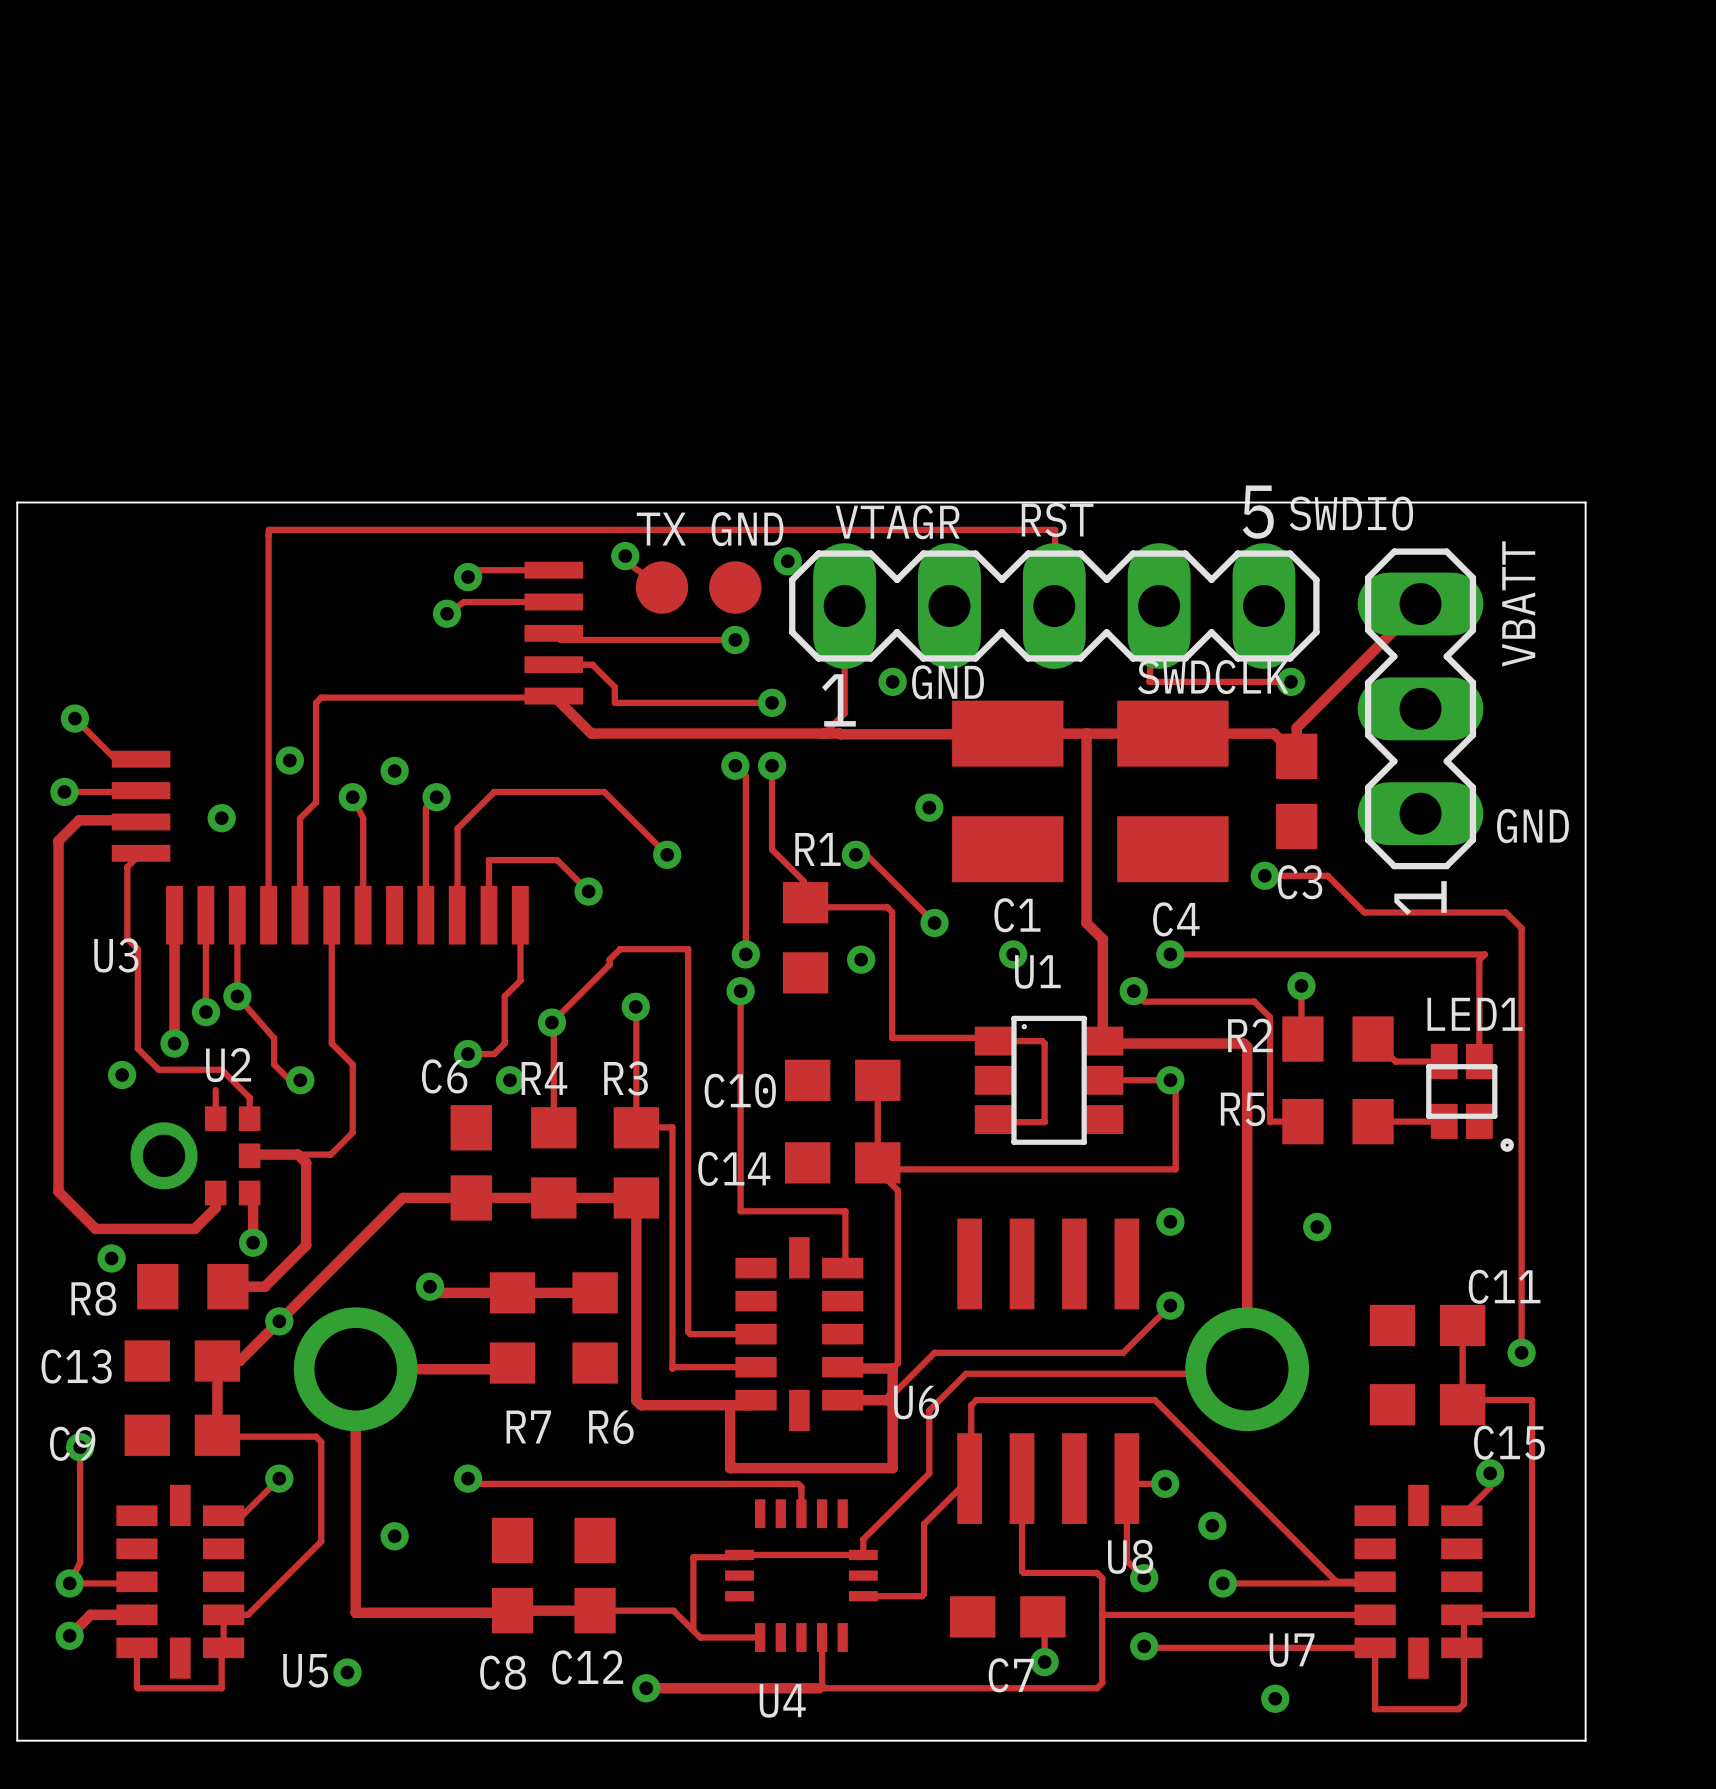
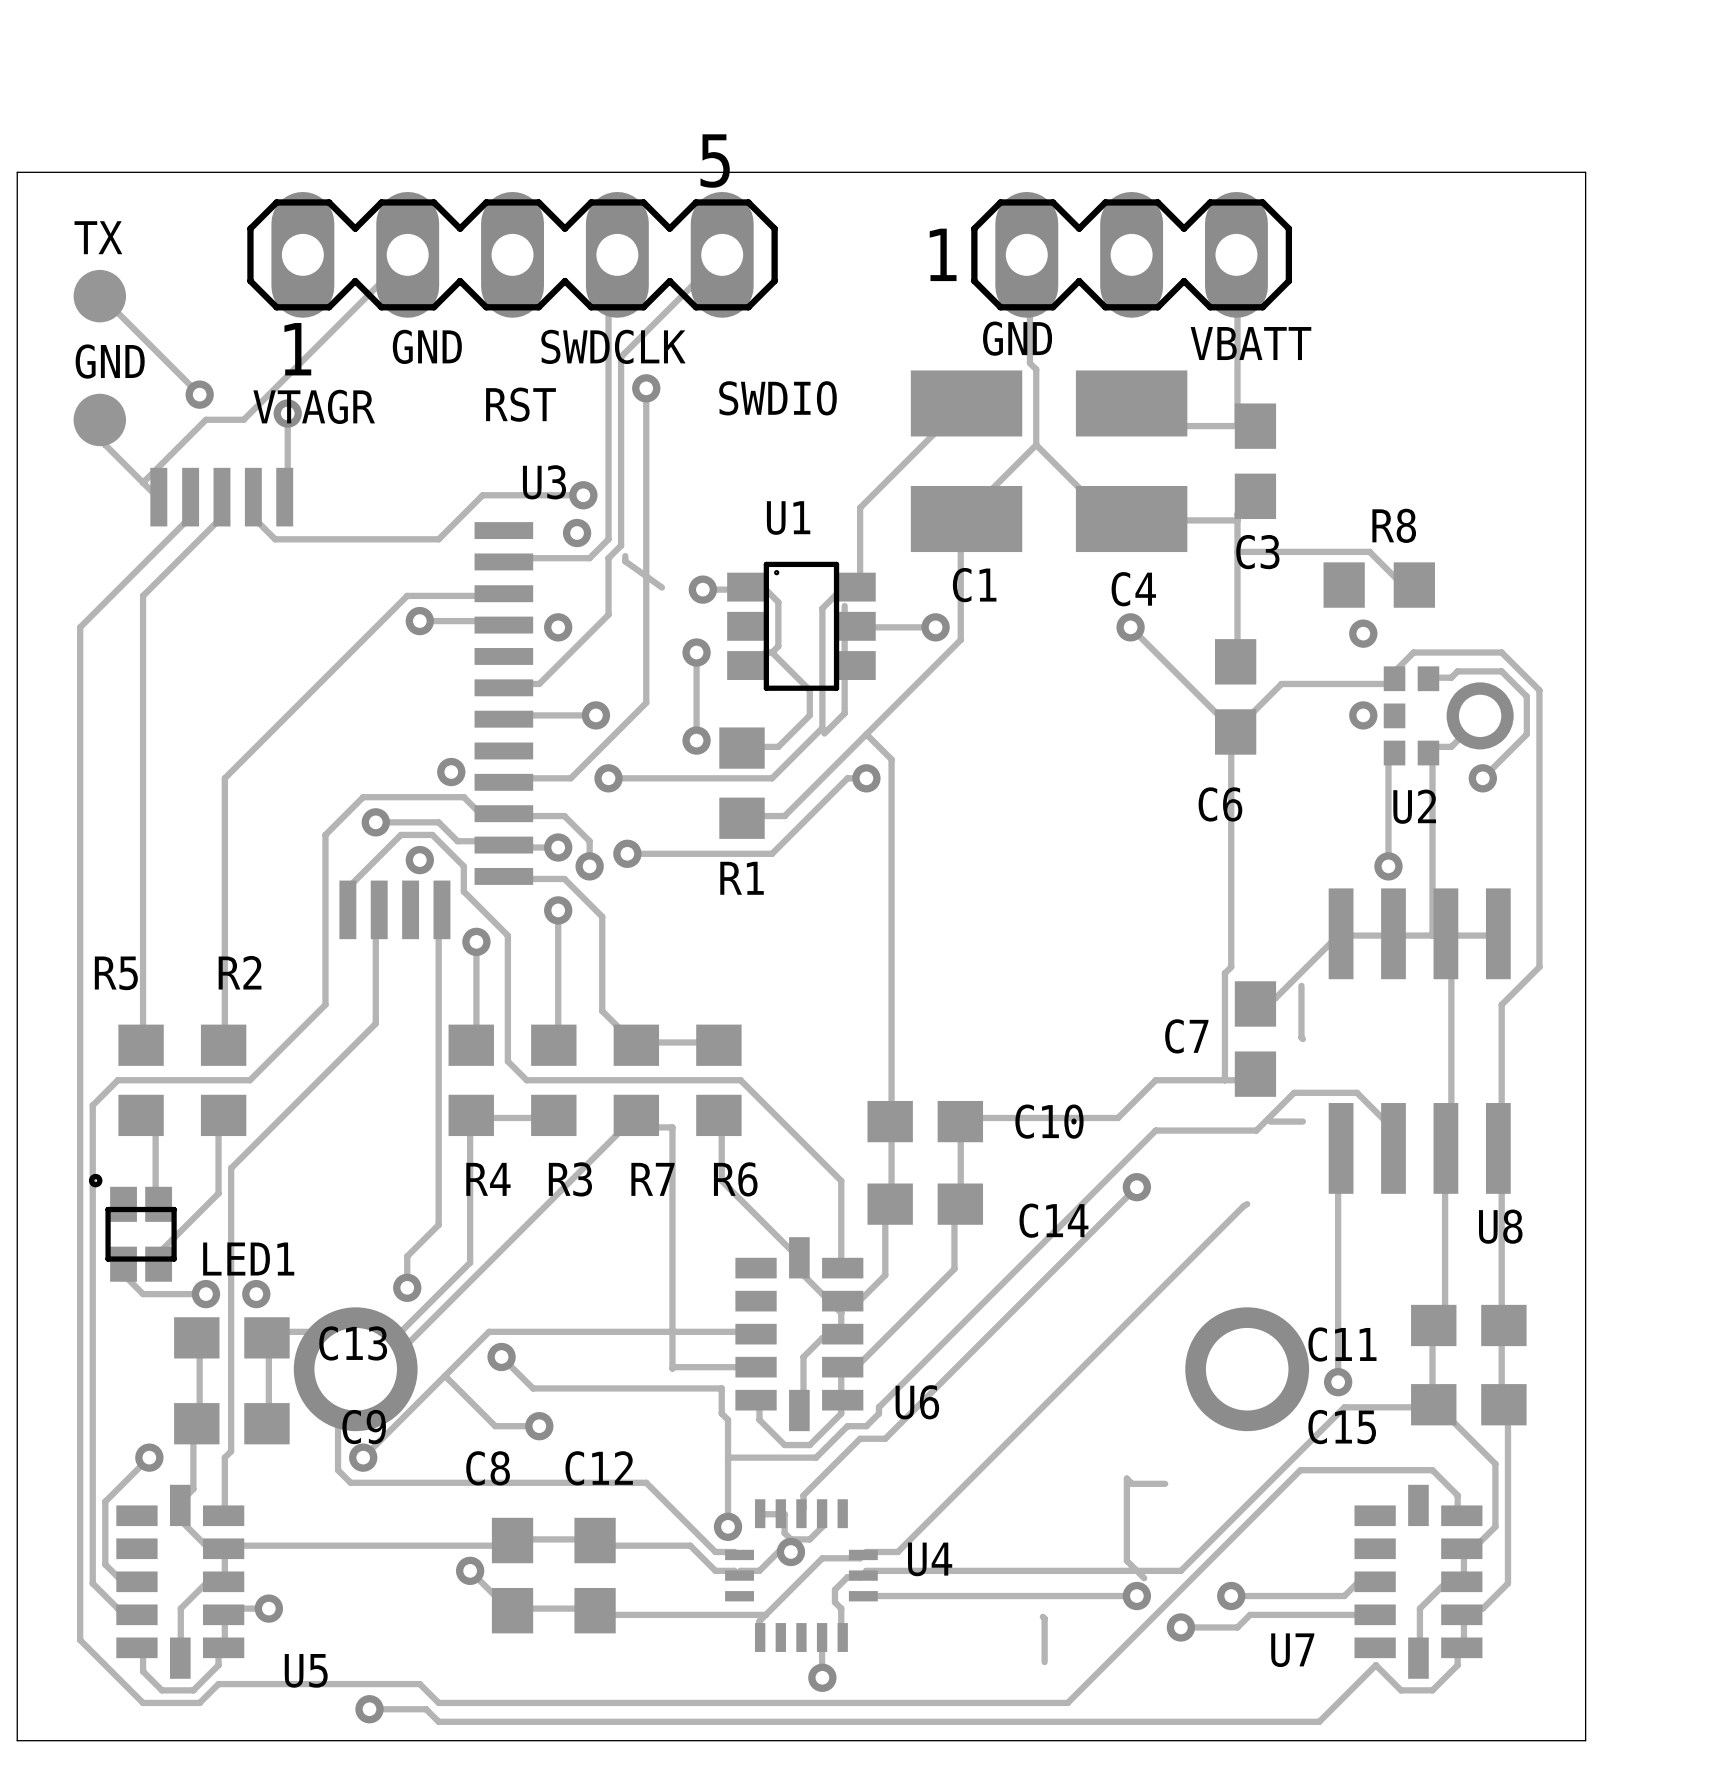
track: none -> (407, 254) (243, 419) (205, 419) (143, 482)
track: none -> (617, 254) (608, 262) (608, 539) (589, 558) (507, 558) (503, 561)
track: none -> (722, 254) (621, 356) (621, 545) (608, 558) (608, 614) (539, 683) (507, 683) (503, 687)
track: none -> (1026, 254) (1029, 256) (1029, 363) (1036, 369) (1036, 444)
track: none -> (1236, 254) (1237, 256) (1237, 426) (1255, 426) (1155, 426) (1131, 403)
track: none -> (99, 296) (199, 394)
text: none -> GND (1017, 338)
text: none -> GND (427, 346)
track: none -> (646, 388) (646, 702) (570, 778) (507, 778) (503, 782)
via: none -> (646, 388)
via: none -> (199, 394)
track: none -> (966, 403) (860, 507) (860, 583) (853, 589) (841, 589) (822, 608) (822, 728) (772, 778) (608, 778)
track: none -> (287, 413) (287, 495) (284, 497)
via: none -> (287, 413)
track: none -> (99, 419) (105, 426) (105, 444) (158, 497)
track: none -> (1036, 444) (967, 514) (966, 519) (960, 520) (960, 639) (784, 816) (746, 816) (742, 818)
track: none -> (1036, 444) (1105, 514) (1130, 514) (1131, 519) (1136, 520) (1237, 520)
track: none -> (583, 495) (482, 495) (438, 539) (275, 539) (256, 520) (256, 501) (253, 497)
via: none -> (583, 495)
track: none -> (1255, 496) (1237, 514) (1237, 658) (1235, 661)
track: none -> (190, 497) (187, 501) (187, 520) (80, 627) (80, 1447)
track: none -> (221, 497) (218, 501) (218, 520) (143, 595) (143, 1042) (141, 1045)
board edge: (17, 502) (1585, 502) -> (17, 502) (17, 172) (1585, 172) (1585, 502)
text position: SWDIO (1351, 513) -> SWDIO (777, 398)
text position: RST (1057, 519) -> RST (520, 404)
text position: VTAGR (897, 522) -> VTAGR (314, 406)
via: none -> (577, 533)
track: none -> (1237, 551) (1369, 551) (1401, 583) (1413, 583) (1414, 585)
via: (625, 556) -> none
via: (787, 561) -> none
track: (553, 570) (474, 570) (468, 577) -> none
via: (468, 577) -> none
TX position: (661, 587) -> (99, 296)
GND position: (735, 587) -> (99, 419)
track: none -> (702, 589) (746, 589) (747, 587) (753, 589) (765, 589) (778, 602) (778, 646) (772, 652)
via: none -> (702, 589)
track: none -> (503, 593) (501, 595) (407, 595) (224, 778) (223, 1045)
track: (553, 601) (464, 601) (447, 613) -> none
text rotation: 0° (1518, 603) -> 90° clockwise (1250, 343)
text position: VBATT (1518, 603) -> VBATT (1250, 343)
track: (1420, 604) (1296, 727) (1296, 756) (1274, 733) (591, 733) (553, 696) (552, 697) (321, 697) (316, 702) (316, 802) (299, 818) (299, 915) -> none
track: (1054, 606) (1055, 529) (268, 529) (268, 915) -> none
part position: (1054, 606) -> (512, 254)
track: (1159, 606) (1154, 585) (1149, 681) (1290, 681) -> none
via position: (447, 613) -> (419, 621)
track: none -> (419, 621) (501, 621) (503, 625)
track: none -> (855, 626) (935, 627)
via: none -> (558, 627)
via: none -> (935, 627)
track: none -> (1130, 627) (1235, 731)
via: none -> (1130, 627)
track: (553, 633) (560, 639) (735, 639) -> none
via: none -> (1363, 633)
via: (735, 639) -> none
track: none -> (696, 652) (696, 740)
via: none -> (696, 652)
track: none -> (772, 652) (809, 690) (809, 715) (778, 746) (742, 748)
track: (553, 664) (592, 664) (614, 687) (614, 702) (772, 702) -> none
text position: SWDCLK (1213, 677) -> SWDCLK (613, 346)
track: none -> (1428, 678) (1451, 677) (1457, 671) (1501, 671) (1526, 696) (1526, 734) (1482, 778)
via: (892, 681) -> none
via: (1290, 681) -> none
text: GND (948, 682) -> none
via: (772, 702) -> none
part rotation: 0° (1420, 708) -> 90° clockwise (1131, 254)
part position: (1420, 708) -> (1131, 254)
track: none -> (595, 715) (507, 715) (503, 719)
via: none -> (595, 715)
via: none -> (1363, 715)
track: none -> (1480, 715) (1451, 746) (1432, 746) (1428, 753) (1432, 753) (1432, 935)
track: (74, 718) (115, 759) (141, 759) -> none
via: (74, 718) -> none
track: none -> (1235, 731) (1281, 683) (1388, 683) (1394, 678) (1388, 677) (1413, 652) (1501, 652) (1539, 690) (1539, 967) (1501, 1004) (1501, 1143) (1498, 1148) (1501, 1149) (1501, 1319) (1503, 1325) (1501, 1325) (1501, 1401) (1507, 1407) (1507, 1583) (1482, 1608) (1463, 1608) (1461, 1614) (1463, 1614)
track: none -> (1235, 731) (1231, 734) (1231, 967) (1224, 973) (1224, 1080)
track: (1086, 733) (1086, 922) (1102, 939) (1102, 1041) (1105, 1043) (1243, 1043) (1247, 1046) (1247, 1369) (1242, 1373) (966, 1373) (929, 1410) (929, 1473) (863, 1539) (863, 1554) (739, 1554) (737, 1557) (693, 1557) (693, 1630) -> none
track: none -> (866, 734) (891, 759) (891, 1199) (890, 1204) (885, 1206) (885, 1275) (860, 1300) (842, 1301) (841, 1338) (822, 1338) (803, 1357) (803, 1407) (799, 1410)
via: none -> (696, 740)
U3 rotation: 0° (347, 753) -> 90° counterclockwise (341, 703)
track: none -> (1394, 753) (1388, 753) (1388, 866)
via: (289, 760) -> none
track: (735, 765) (745, 776) (745, 954) -> none
via: (735, 765) -> none
track: (772, 765) (772, 849) (803, 881) (803, 911) (805, 902) -> none
via: (772, 765) -> none
via: (394, 770) -> none
via: none -> (608, 778)
track: none -> (866, 778) (847, 778) (772, 853) (627, 853)
via: none -> (866, 778)
via: none -> (1482, 778)
track: (141, 790) (64, 791) -> none
via: (64, 791) -> none
C1 position: (1007, 791) -> (966, 461)
C4 position: (1172, 791) -> (1131, 461)
C3 position: (1296, 791) -> (1255, 461)
track: (352, 797) (363, 818) (363, 915) -> none
via position: (352, 797) -> (375, 822)
track: (436, 797) (425, 807) (425, 915) -> none
via position: (436, 797) -> (451, 772)
via: (929, 807) -> none
via: (221, 818) -> none
track: (141, 821) (139, 820) (79, 820) (58, 840) (58, 1191) (95, 1228) (194, 1228) (215, 1207) (215, 1193) -> none
track: none -> (375, 822) (438, 822) (457, 841) (501, 841) (507, 847) (558, 847)
text: GND (1532, 826) -> none
via: none -> (558, 847)
R1 name position: R1 (817, 849) -> R1 (742, 878)
track: (141, 853) (127, 867) (127, 938) (137, 949) (137, 1048) (158, 1069) (221, 1069) (249, 1097) (249, 1118) -> none
via: none -> (627, 853)
track: (667, 854) (604, 791) (494, 791) (457, 828) (457, 915) -> none
via: (667, 854) -> none
track: (855, 854) (866, 854) (934, 922) -> none
via: (855, 854) -> none
via: none -> (419, 860)
via: none -> (1388, 866)
track: (1264, 875) (1327, 875) (1364, 912) (1505, 912) (1521, 928) (1521, 1352) -> none
via: (1264, 875) -> none
track: none -> (503, 876) (507, 878) (564, 878) (602, 916) (602, 1011) (636, 1045) (639, 1042) (715, 1042) (718, 1045)
track: (588, 891) (557, 860) (489, 860) (489, 915) -> none
via position: (588, 891) -> (589, 866)
track: (805, 902) (810, 907) (887, 907) (892, 912) (892, 1037) (992, 1037) (995, 1041) (1042, 1041) (1044, 1043) (1044, 1122) (998, 1122) (995, 1119) -> none
track: none -> (441, 909) (438, 910) (438, 1224) (407, 1256) (407, 1287)
track: none -> (558, 910) (558, 1042) (553, 1045)
via: none -> (558, 910)
track: (174, 915) (174, 1043) -> none
track: (205, 915) (205, 1012) -> none
track: (237, 915) (237, 996) (274, 1038) (274, 1064) (289, 1080) (300, 1080) -> none
track: (331, 915) (331, 1043) (352, 1064) (352, 1132) (330, 1154) (297, 1154) -> none
track: (520, 915) (520, 980) (504, 996) (504, 1043) (494, 1054) (468, 1054) -> none
via: (934, 922) -> none
track: none -> (1498, 933) (1495, 935) (1451, 935)
track: none -> (1451, 935) (1451, 1143) (1445, 1149) (1445, 1312) (1432, 1325) (1433, 1404)
track: none -> (1451, 935) (1445, 933) (1445, 935) (1394, 935) (1393, 933) (1388, 935) (1344, 935) (1341, 933) (1275, 998) (1256, 998) (1255, 1003)
R1 position: (805, 937) -> (742, 783)
track: none -> (476, 941) (476, 1042) (471, 1045)
via: none -> (476, 941)
via: (745, 954) -> none
via: (1013, 954) -> none
track: (1170, 954) (1484, 954) (1479, 960) (1479, 1061) -> none
via: (1170, 954) -> none
U3 name position: U3 (116, 955) -> U3 (544, 482)
via: (861, 959) -> none
via: (1301, 985) -> none
track: (740, 991) (740, 1211) (845, 1211) (845, 1265) (842, 1268) -> (347, 909) (350, 904) (350, 885) (400, 834) (432, 834) (463, 866) (463, 891) (507, 935) (507, 1061) (526, 1080) (740, 1080) (841, 1180) (842, 1268)
via: (740, 991) -> none
track: (1133, 991) (1144, 1001) (1254, 1001) (1270, 1017) (1270, 1122) -> none
via: (1133, 991) -> none
via: (237, 996) -> none
via: (635, 1006) -> none
track: (636, 1007) (636, 1127) -> none
via: (205, 1012) -> none
LED1 name position: LED1 (1475, 1014) -> LED1 (248, 1259)
via: (551, 1022) -> none
R2 rotation: 0° (1337, 1039) -> 90° clockwise (223, 1080)
R2 position: (1337, 1039) -> (223, 1080)
track: (1373, 1039) (1395, 1061) (1444, 1061) -> none
via: (174, 1043) -> none
via: (468, 1054) -> none
track: none -> (1255, 1074) (1250, 1080) (1170, 1080)
via: (122, 1075) -> none
C6 name position: C6 (444, 1076) -> C6 (1220, 804)
R4 name position: R4 (544, 1078) -> R4 (488, 1179)
R3 name position: R3 (626, 1078) -> R3 (570, 1179)
via: (300, 1080) -> none
via: (509, 1080) -> none
C10 position: (842, 1080) -> (925, 1121)
track: (877, 1080) (877, 1162) (884, 1169) -> none
U1 position: (1049, 1080) -> (801, 626)
track: (1102, 1080) (1155, 1080) -> (756, 1400) (759, 1401) (759, 1419) (784, 1445) (809, 1445) (841, 1413) (842, 1367) (847, 1363) (860, 1363) (954, 1268) (954, 1206) (960, 1204) (960, 1199) (960, 1117) (1118, 1117) (1155, 1080)
track: (1165, 1080) (1175, 1090) (1175, 1169) (884, 1169) -> none
via: (1170, 1080) -> none
track: (215, 1089) (215, 1118) -> none
C10 name position: C10 (740, 1090) -> C10 (1049, 1121)
LED1 rotation: 0° (1470, 1097) -> 180° (132, 1227)
LED1 position: (1470, 1097) -> (132, 1227)
track: none -> (141, 1115) (155, 1130) (155, 1199) (158, 1204)
track: none -> (223, 1115) (218, 1117) (218, 1193) (161, 1250) (161, 1262) (158, 1264)
track: none -> (553, 1115) (551, 1117) (476, 1117) (471, 1115) (470, 1262) (400, 1331) (268, 1331) (266, 1337) (268, 1338) (268, 1419) (266, 1423)
track: none -> (636, 1115) (338, 1413) (338, 1470) (350, 1482) (646, 1482) (715, 1551) (734, 1551) (739, 1554)
track: none -> (718, 1115) (721, 1117) (721, 1180) (799, 1257) (803, 1262) (803, 1275) (841, 1312)
R5 rotation: 0° (1337, 1121) -> 90° clockwise (141, 1080)
R5 position: (1337, 1121) -> (141, 1080)
track: (1373, 1121) (1444, 1121) -> none
track: (553, 1127) (553, 1024) (551, 1022) (609, 964) (609, 959) (620, 949) (688, 949) (688, 1331) (690, 1334) (756, 1334) -> (363, 1457) (489, 1331) (753, 1331) (756, 1334)
track: none -> (1341, 1148) (1338, 1149) (1338, 1382)
track: none -> (1393, 1148) (1388, 1143) (1388, 1124) (1357, 1092) (1294, 1092) (1256, 1130) (1155, 1130) (878, 1407) (878, 1413) (866, 1426) (847, 1426) (816, 1457) (728, 1457)
track: (297, 1154) (249, 1155) -> none
track: (297, 1154) (306, 1162) (306, 1245) (264, 1286) (227, 1286) -> none
U2 rotation: 0° (195, 1155) -> 180° (1448, 715)
U2 position: (195, 1155) -> (1448, 715)
C6 position: (471, 1162) -> (1235, 696)
R4 position: (553, 1162) -> (471, 1080)
R3 position: (636, 1162) -> (553, 1080)
C14 position: (842, 1162) -> (925, 1204)
C14 name position: C14 (734, 1168) -> C14 (1053, 1220)
track: (884, 1169) (884, 1176) (897, 1190) (897, 1363) (892, 1368) -> none
track: (249, 1193) (253, 1196) (253, 1242) -> none
via position: (1170, 1221) -> (1136, 1187)
via: (1317, 1227) -> none
via: (253, 1242) -> none
via: (111, 1258) -> none
track: none -> (123, 1264) (124, 1275) (143, 1294) (205, 1294)
R8 position: (192, 1286) -> (1379, 585)
track: (429, 1286) (436, 1292) (595, 1292) -> none
via position: (429, 1286) -> (407, 1287)
C11 name position: C11 (1504, 1286) -> C11 (1342, 1344)
via: none -> (205, 1294)
R8 name position: R8 (93, 1298) -> R8 (1394, 525)
track: (1170, 1305) (1123, 1352) (934, 1352) (887, 1400) (842, 1400) -> none
via: (1170, 1305) -> none
via position: (279, 1321) -> (256, 1294)
C11 position: (1427, 1325) -> (1468, 1325)
track: (1462, 1325) (1462, 1404) (1467, 1399) (1532, 1399) (1532, 1614) (1461, 1614) -> none
R7 position: (512, 1327) -> (636, 1080)
R6 position: (595, 1327) -> (718, 1080)
track: none -> (196, 1337) (199, 1338) (199, 1419) (193, 1426) (193, 1489) (180, 1501) (180, 1520) (205, 1545) (218, 1545) (223, 1548)
via: (1521, 1352) -> none
track: none -> (501, 1357) (533, 1388) (721, 1388) (721, 1413) (728, 1419) (728, 1526)
via: none -> (501, 1357)
C13 position: (182, 1360) -> (231, 1337)
track: (512, 1363) (506, 1369) (355, 1369) (355, 1612) (673, 1610) (700, 1637) (760, 1637) -> (1247, 1204) (897, 1551) (866, 1551) (860, 1558) (822, 1558) (759, 1621) (760, 1637)
C13 name position: C13 (76, 1366) -> C13 (353, 1343)
track: (842, 1367) (892, 1368) -> none
track: (892, 1368) (892, 1468) (730, 1468) (730, 1405) -> none
U8 position: (1048, 1371) -> (1419, 1041)
track: none -> (444, 1375) (495, 1426) (539, 1426)
via: none -> (1338, 1382)
track: (756, 1400) (751, 1405) (641, 1405) (636, 1400) (636, 1197) (402, 1197) (239, 1360) (217, 1360) (218, 1436) (316, 1436) (321, 1441) (321, 1541) (247, 1614) (223, 1614) (221, 1688) (137, 1688) (136, 1647) -> (268, 1608) (224, 1608) (224, 1646) (218, 1652) (218, 1665) (193, 1690) (161, 1690) (143, 1671) (143, 1652) (136, 1647)
C15 position: (1427, 1404) -> (1468, 1404)
track: none -> (1433, 1404) (1432, 1407) (1344, 1407) (1180, 1570) (866, 1570) (860, 1577) (847, 1577) (834, 1589) (834, 1602) (841, 1608) (842, 1637)
track: none -> (1433, 1404) (1438, 1407) (1495, 1463) (1495, 1526) (1476, 1545) (1463, 1545) (1461, 1548) (1463, 1551) (1463, 1577) (1461, 1581) (1445, 1583) (1419, 1608) (1418, 1658)
via: none -> (539, 1426)
C9 position: (182, 1435) -> (231, 1423)
C15 name position: C15 (1509, 1442) -> C15 (1342, 1427)
C9 name position: C9 (72, 1443) -> C9 (364, 1427)
via: (80, 1447) -> none
via: none -> (149, 1457)
via: none -> (363, 1457)
track: (1490, 1473) (1490, 1487) (1461, 1515) -> (80, 1562) (80, 1640) (143, 1702) (199, 1702) (218, 1684) (419, 1684) (438, 1702) (1067, 1702) (1300, 1470) (1432, 1470) (1457, 1495) (1457, 1514) (1461, 1515)
via: (1490, 1473) -> none
track: (279, 1478) (242, 1515) (223, 1515) -> (379, 909) (375, 910) (375, 1023) (231, 1168) (231, 1451) (224, 1457) (223, 1515)
via: (279, 1478) -> none
track: (468, 1478) (473, 1483) (798, 1483) (801, 1487) (801, 1513) -> (1136, 1187) (885, 1438) (860, 1438) (803, 1495) (801, 1513)
via: (468, 1478) -> none
track: (1022, 1478) (1022, 1571) (1023, 1572) (1097, 1572) (1102, 1578) (1102, 1683) (1097, 1688) (824, 1688) (822, 1685) (819, 1688) (646, 1688) -> none
via: (1165, 1483) -> none
track: none -> (760, 1513) (784, 1514) (784, 1533) (790, 1539)
track: none -> (822, 1514) (822, 1526) (809, 1539) (790, 1539)
via: (1212, 1525) -> none
via: none -> (728, 1526)
via: (394, 1536) -> none
track: none -> (790, 1539) (759, 1570) (740, 1570) (739, 1575) (734, 1570) (715, 1570) (690, 1545) (595, 1545) (595, 1540) (589, 1539) (514, 1539) (507, 1545) (224, 1545) (223, 1548)
track: none -> (223, 1548) (223, 1581) (205, 1583) (180, 1608) (180, 1658)
via: none -> (790, 1551)
track: (80, 1562) (69, 1583) (135, 1583) (136, 1581) -> (149, 1457) (105, 1501) (105, 1564) (117, 1577) (136, 1577) (136, 1581)
track: none -> (470, 1570) (507, 1608) (512, 1610) (514, 1608) (589, 1608) (595, 1610) (595, 1614) (765, 1614)
via: none -> (470, 1570)
via position: (1144, 1578) -> (1136, 1596)
via: (69, 1583) -> none
track: (1222, 1583) (1357, 1583) -> (1231, 1596) (1344, 1596) (1357, 1583)
via position: (1222, 1583) -> (1231, 1596)
track: (1369, 1583) (1380, 1583) (1336, 1581) (1154, 1399) (976, 1399) (971, 1405) (971, 1476) (924, 1524) (924, 1593) (921, 1596) (863, 1596) -> (1136, 1596) (863, 1596)
via: none -> (268, 1608)
track: (136, 1614) (90, 1614) (69, 1635) -> (136, 1614) (136, 1608) (117, 1608) (92, 1583) (92, 1105) (117, 1080) (249, 1080) (325, 1004) (325, 834) (363, 797) (463, 797) (476, 809) (501, 809) (507, 816) (564, 816) (589, 841) (589, 866)
track: (1102, 1614) (1250, 1614) -> (1180, 1627) (1237, 1627) (1250, 1614)
C7 rotation: 0° (1007, 1616) -> 90° clockwise (1255, 1039)
C7 position: (1007, 1616) -> (1255, 1039)
via: none -> (1180, 1627)
via: (69, 1635) -> none
track: (1463, 1645) (1461, 1647) (1463, 1649) (1463, 1703) (1458, 1709) (1374, 1709) -> (1463, 1646) (1457, 1652) (1457, 1665) (1432, 1690) (1401, 1690) (1375, 1665) (1319, 1721) (438, 1721) (426, 1709) (369, 1709)
track: (1144, 1646) (1375, 1647) (1375, 1708) -> none
via: (1144, 1646) -> none
via: (1044, 1662) -> none
C12 name position: C12 (587, 1667) -> C12 (599, 1468)
via position: (347, 1672) -> (369, 1709)
C8 name position: C8 (503, 1672) -> C8 (488, 1468)
via: none -> (822, 1677)
via: (646, 1688) -> none
via: (1275, 1698) -> none
U4 name position: U4 (782, 1700) -> U4 (930, 1559)

